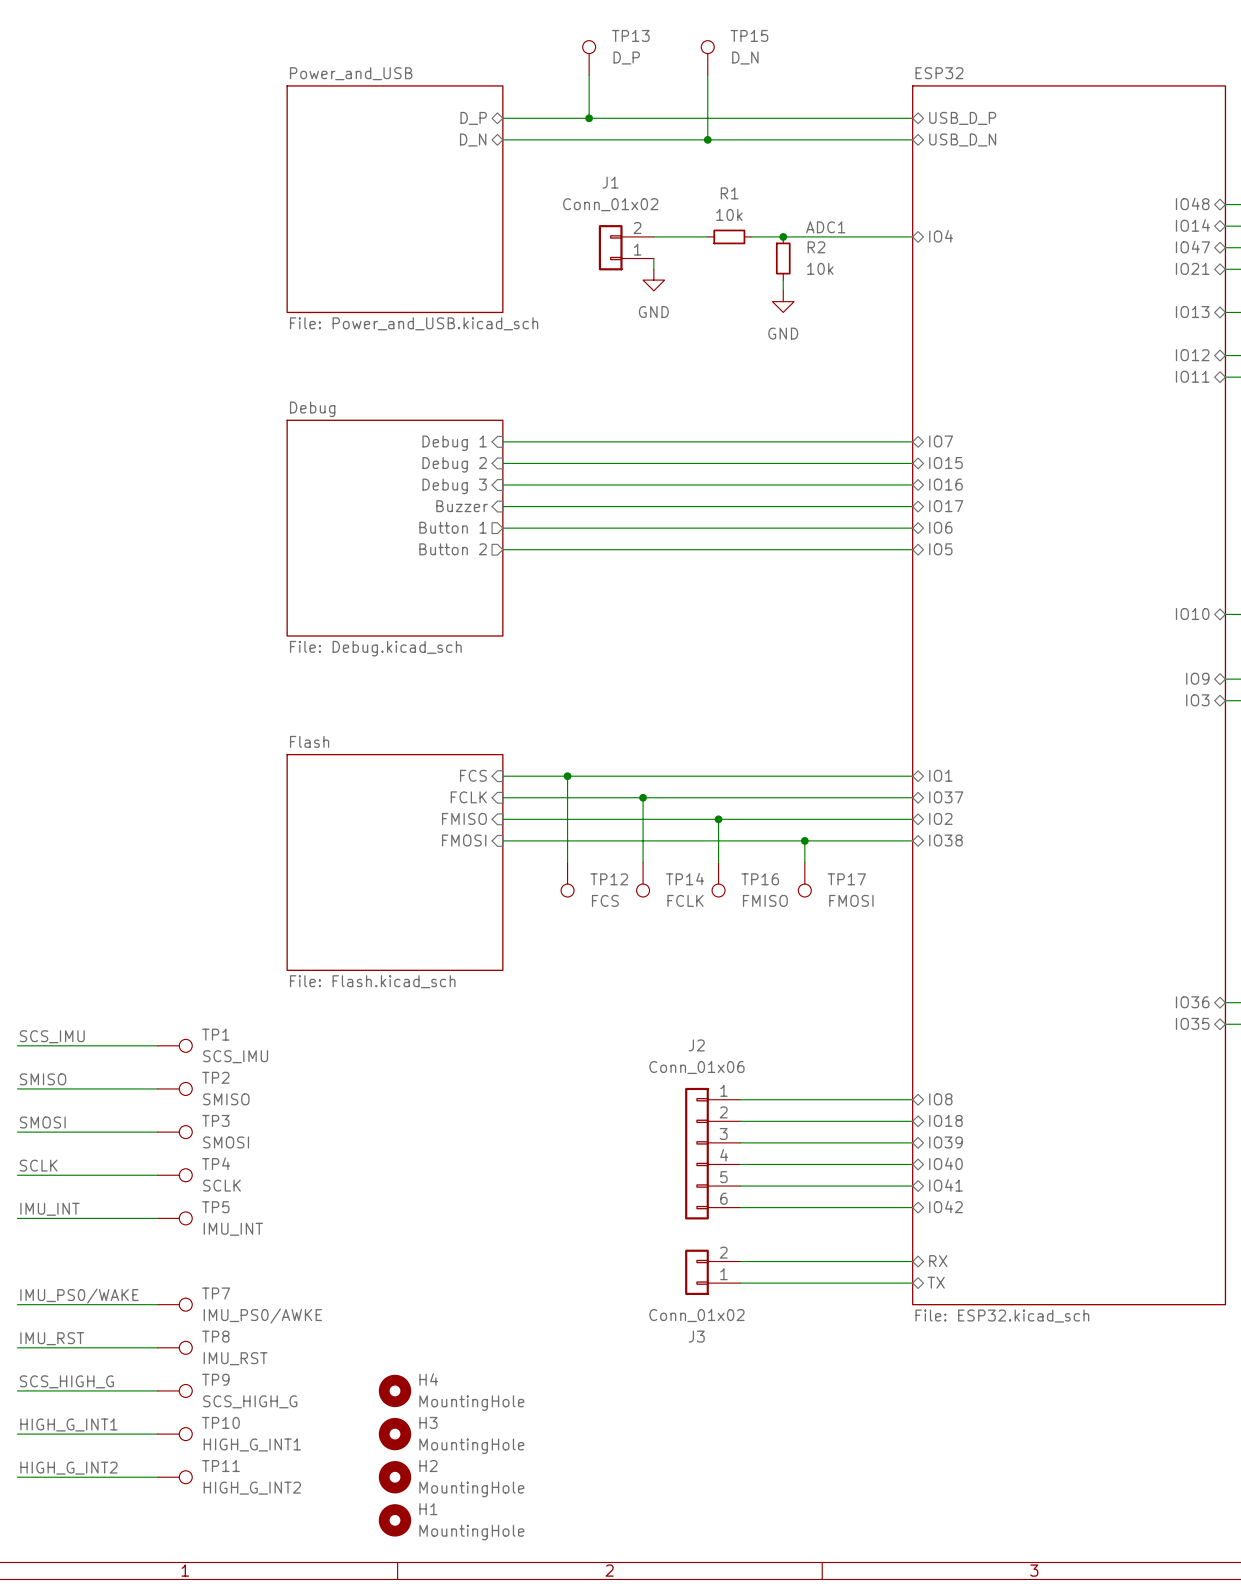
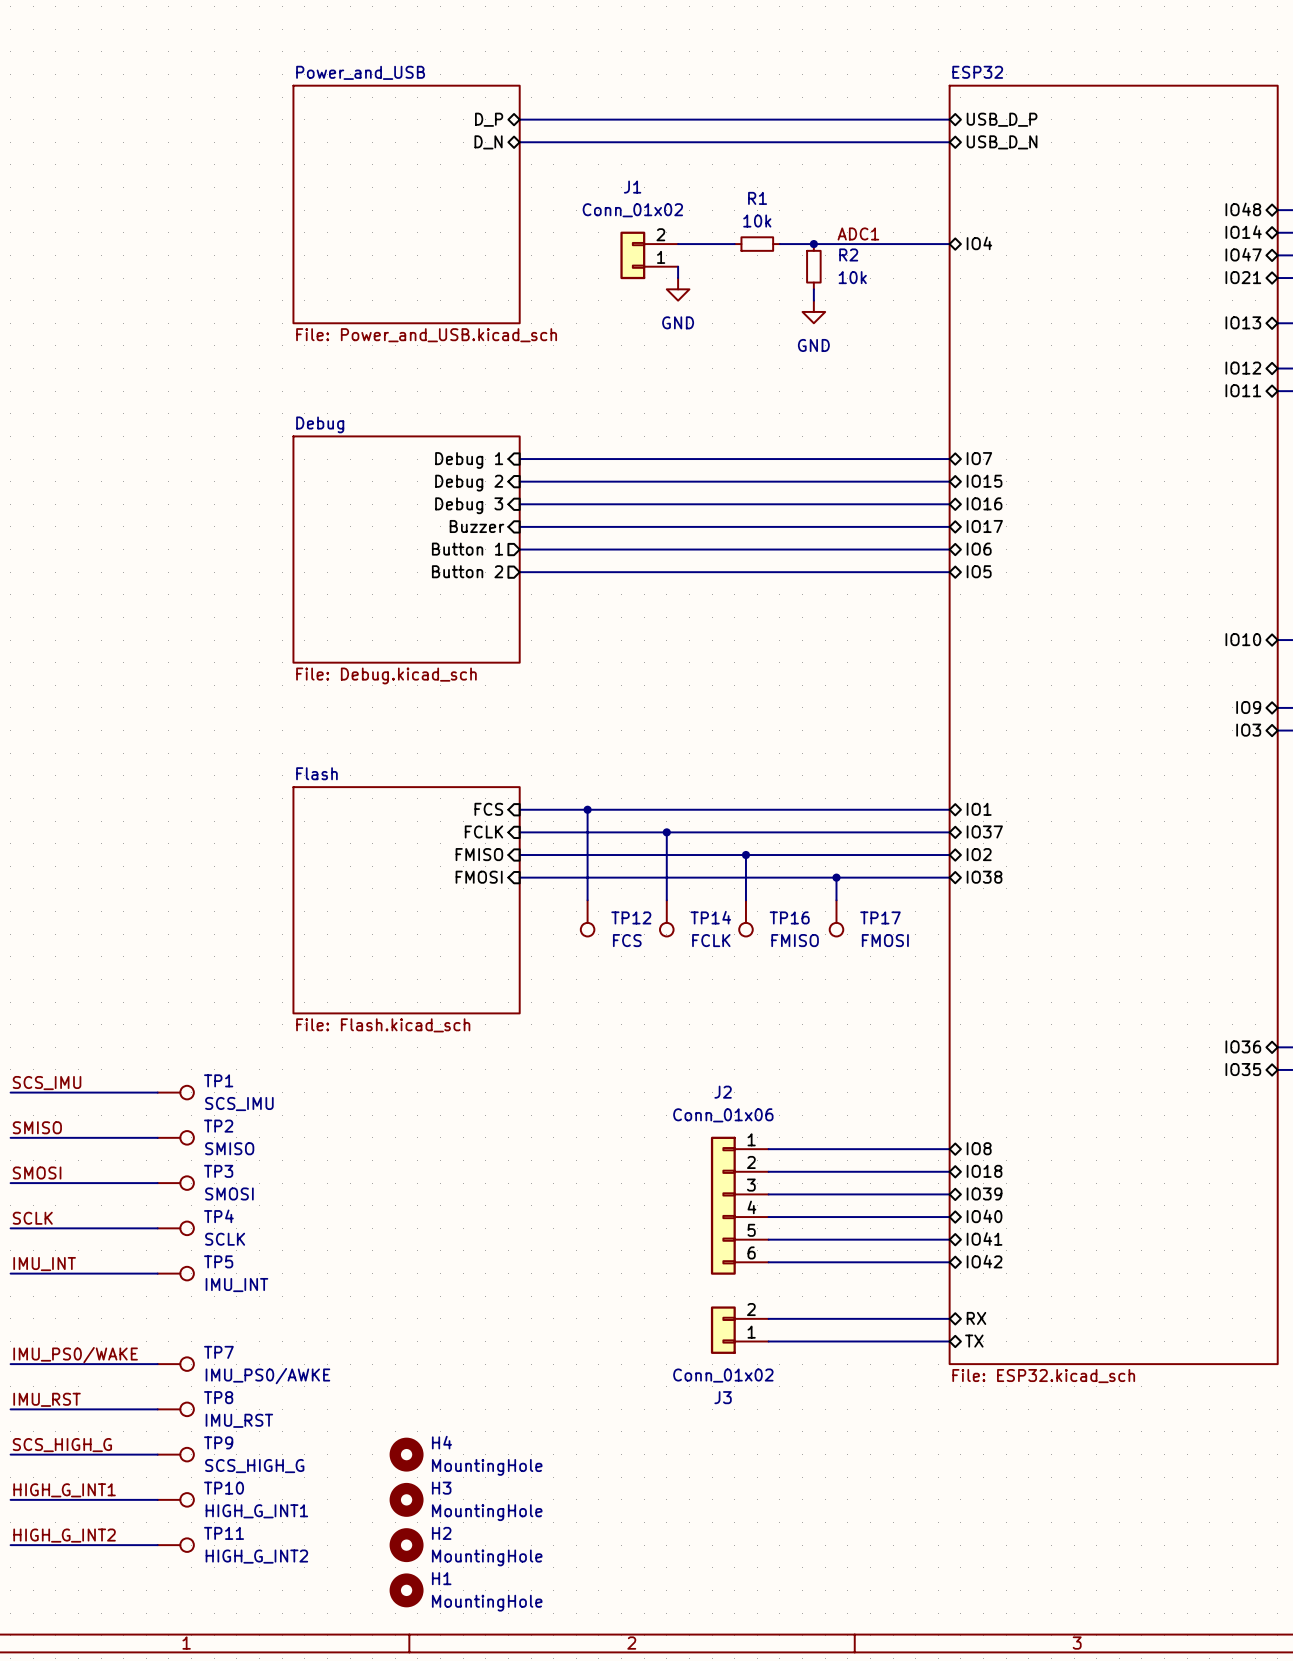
TP13: D_P (589, 57) -> none
TP15: D_N (707, 57) -> none
wire: (589, 75) (589, 118) -> none
wire: (707, 75) (707, 139) -> none
junction: (589, 118) -> none
junction: (707, 139) -> none

